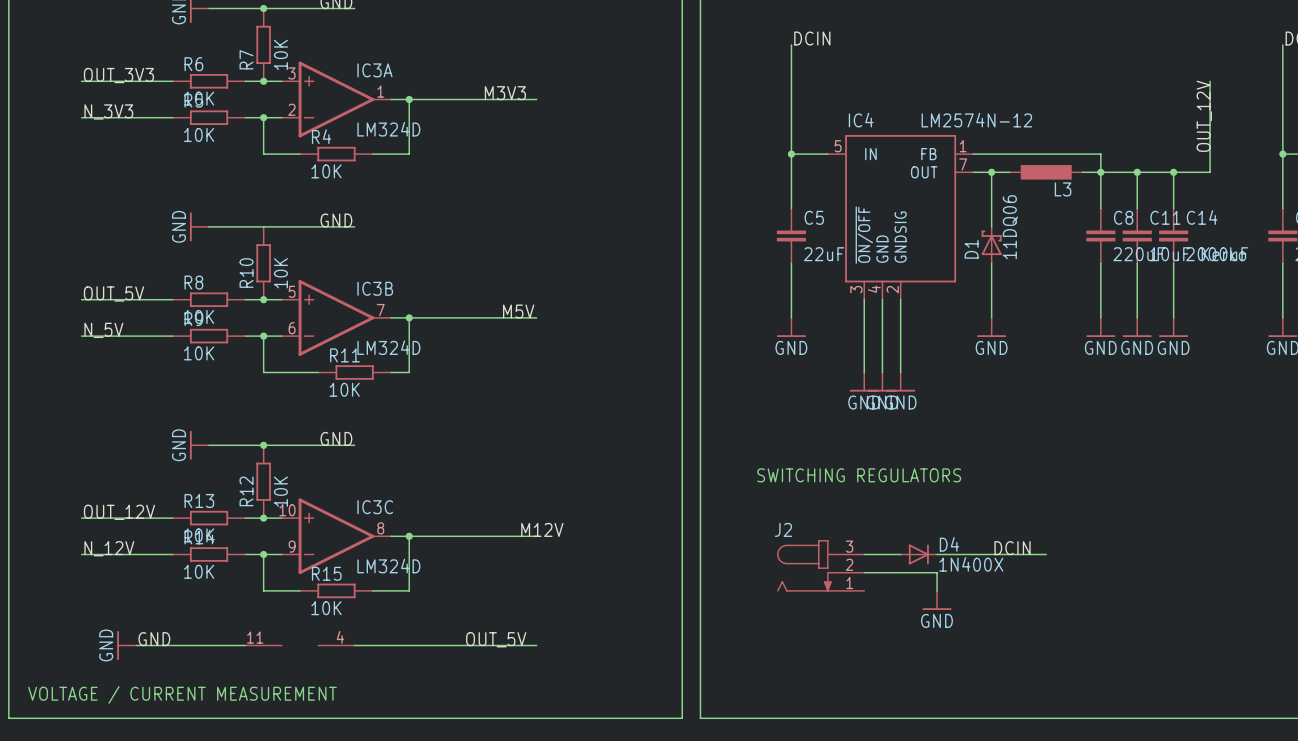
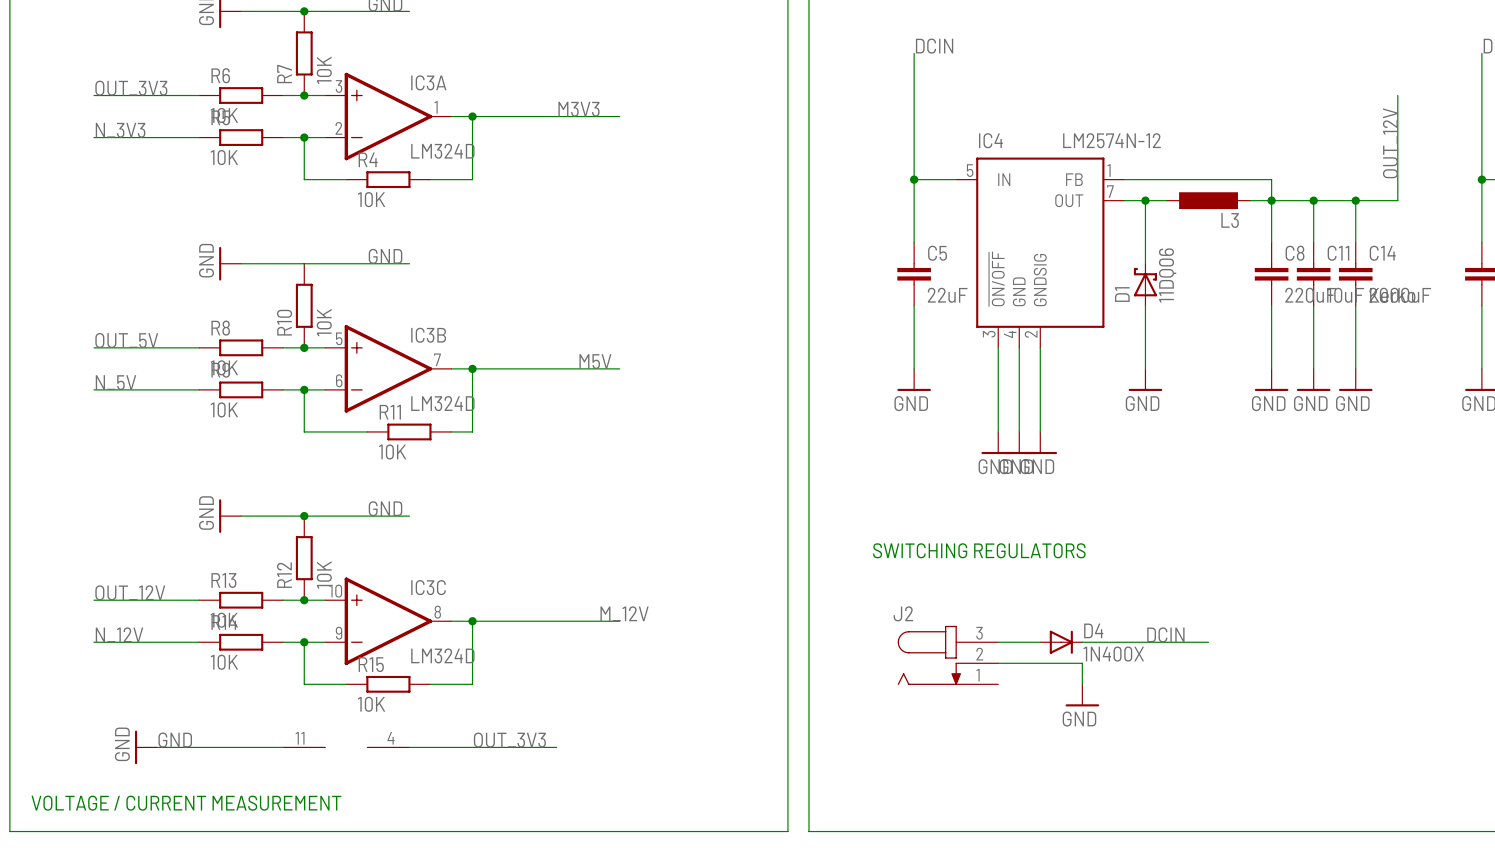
label: M12V (542, 529) -> M_12V (624, 613)
label: OUT_5V (496, 639) -> OUT_3V3 (509, 740)
wire: (482, 645) (536, 645) -> none

